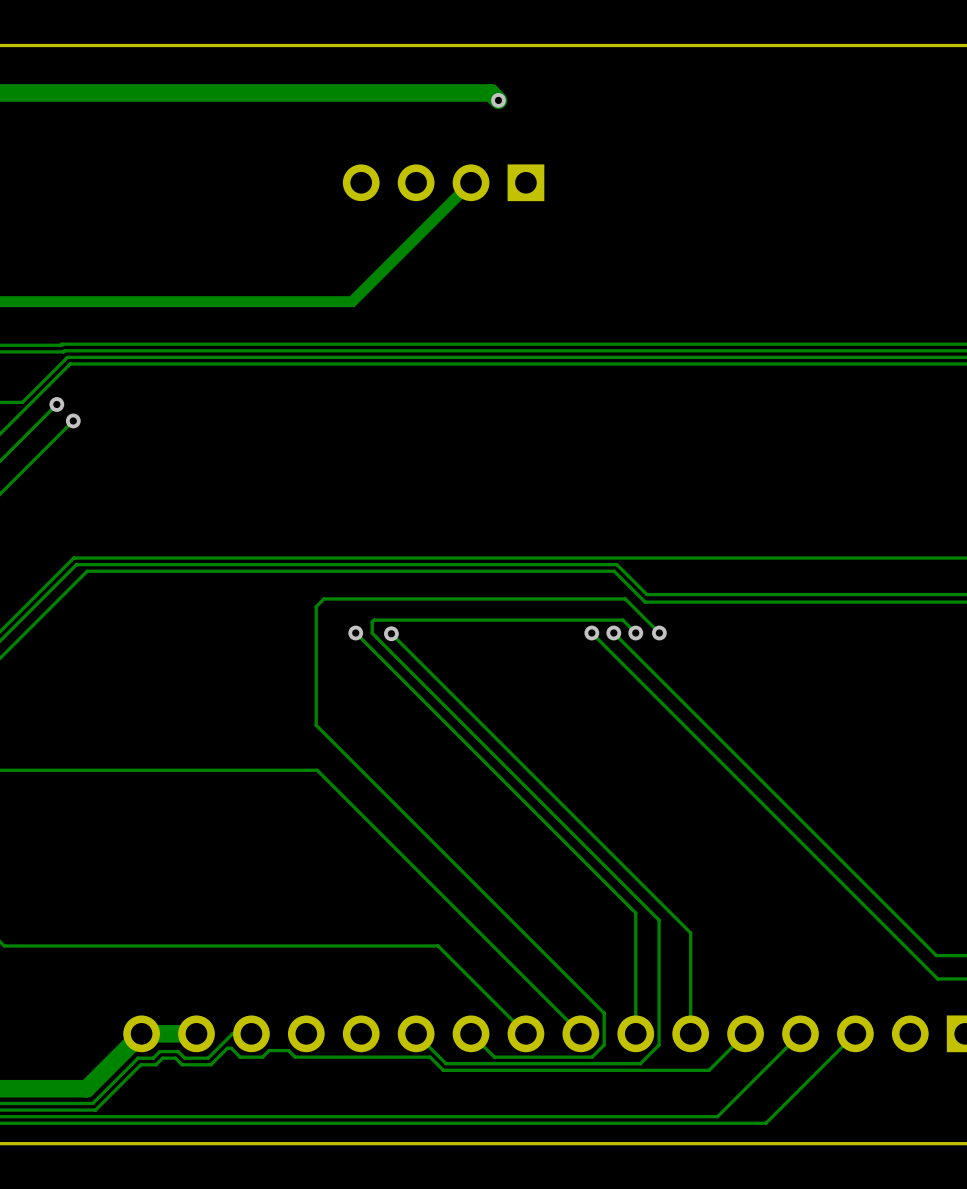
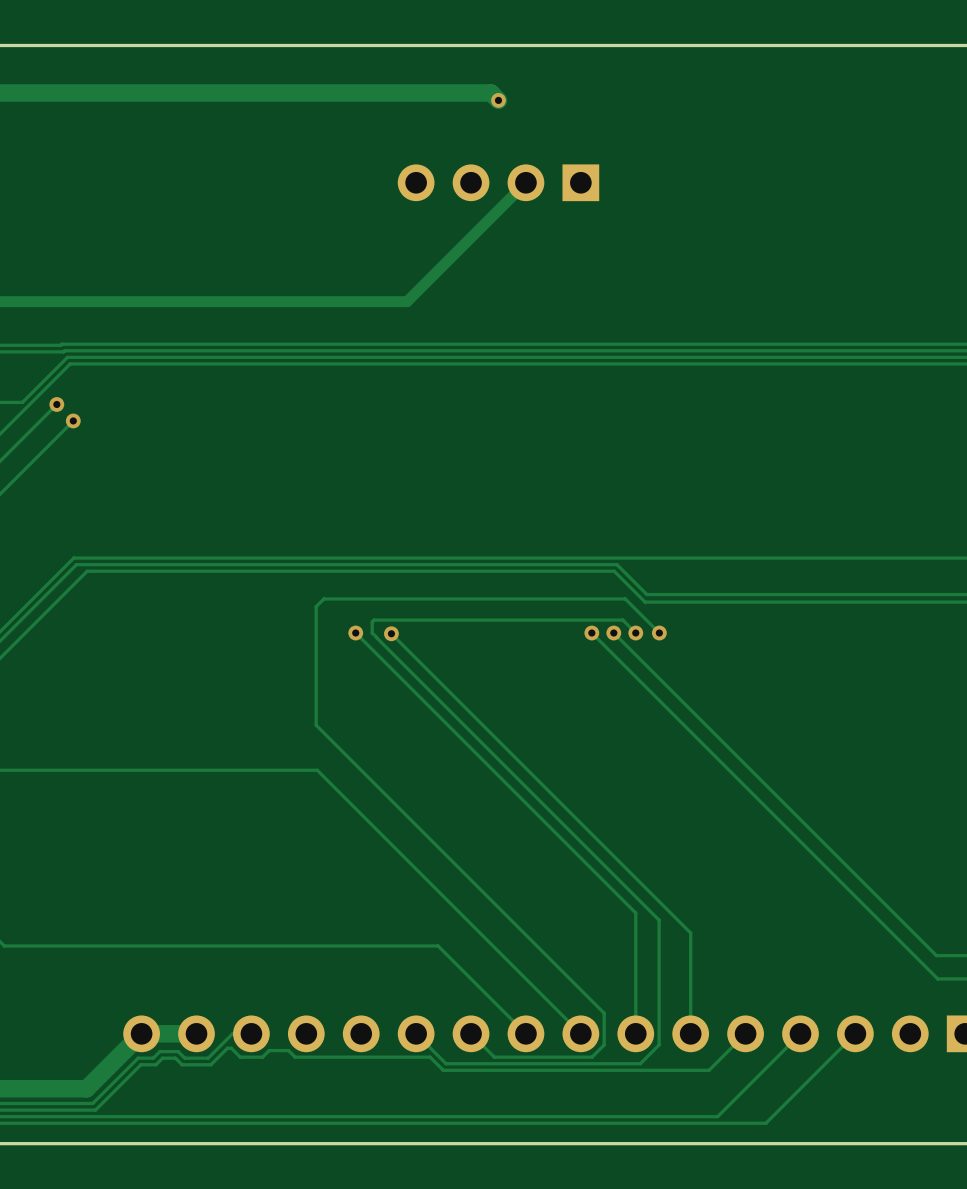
part position: (443, 182) -> (498, 182)
track: (471, 182) (352, 301) -> (525, 182) (407, 301) (352, 301)

